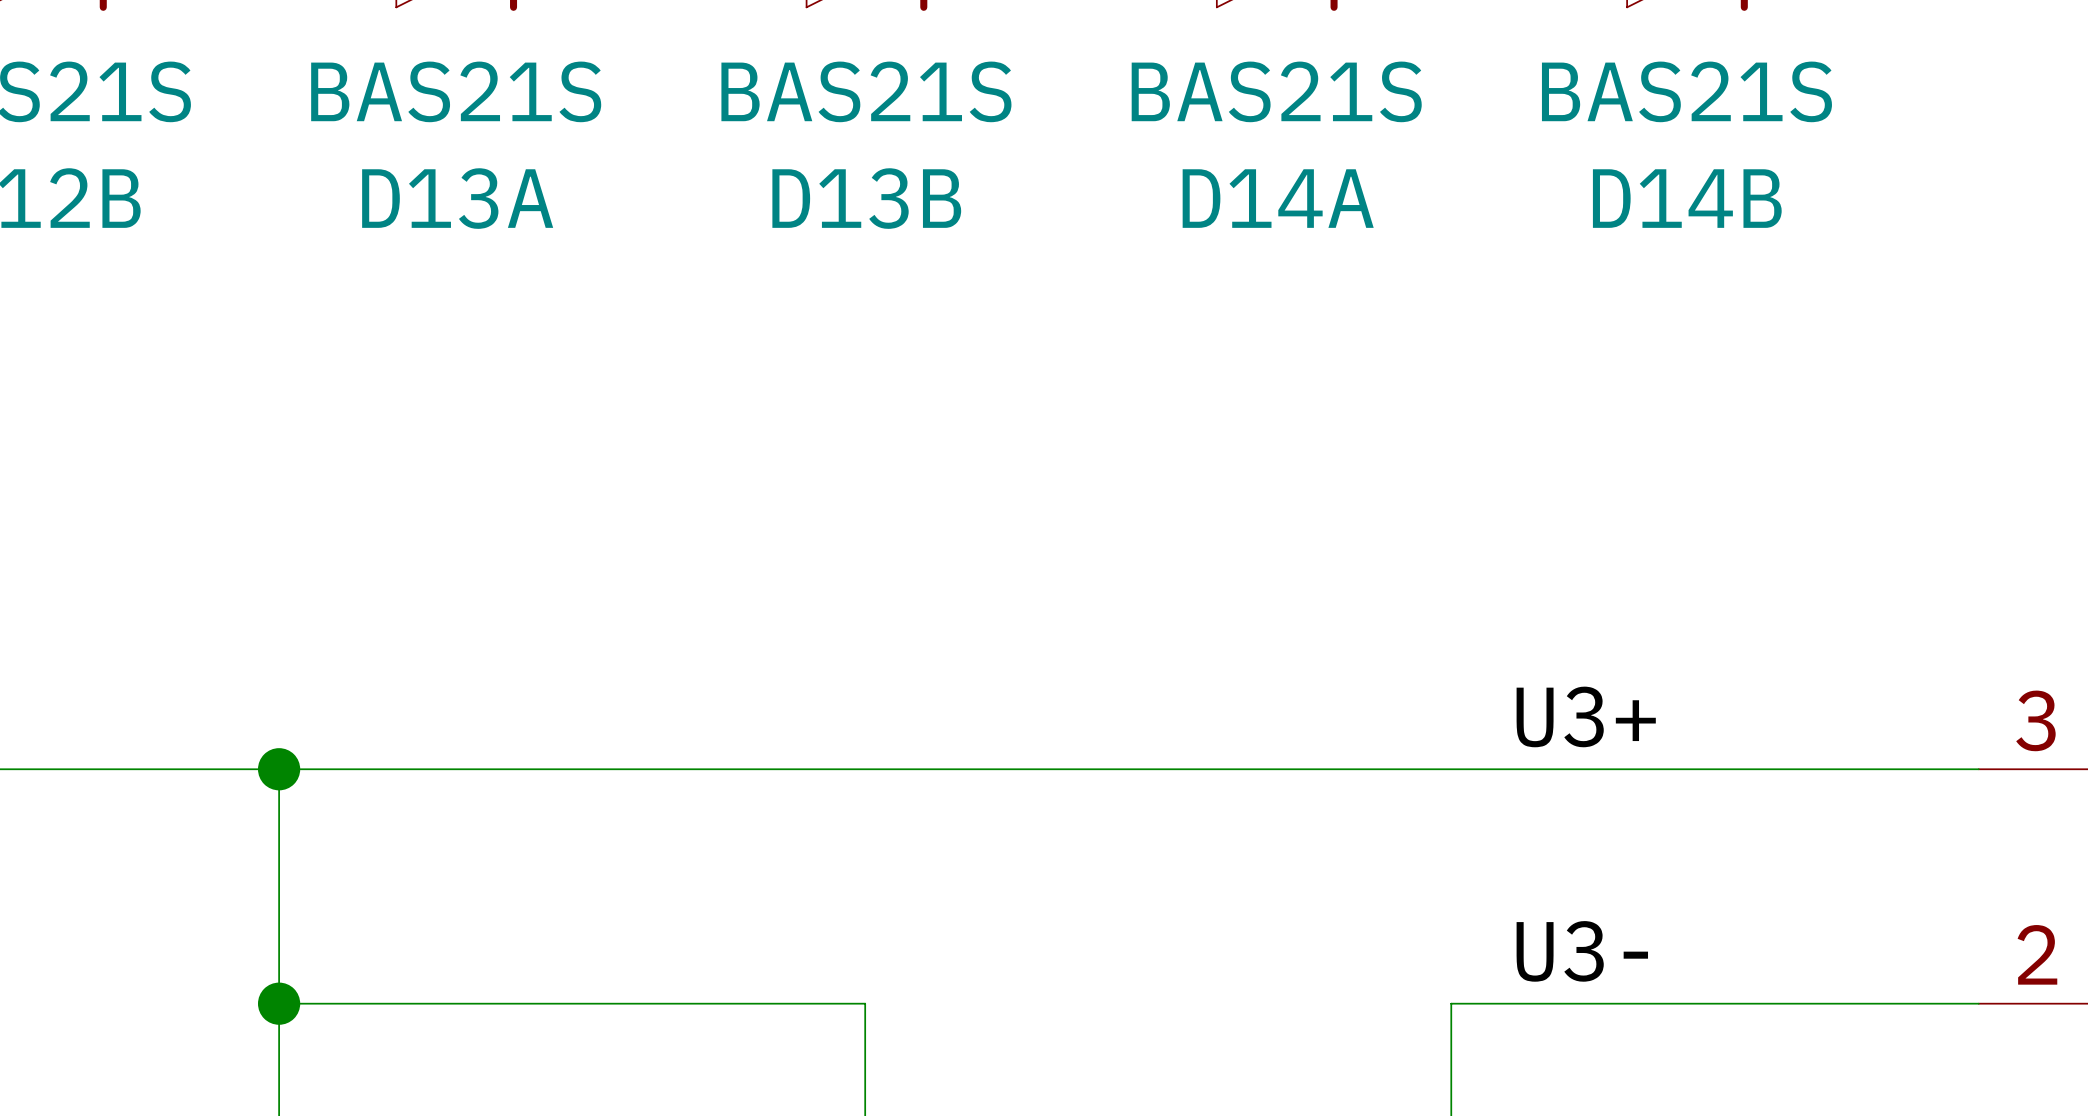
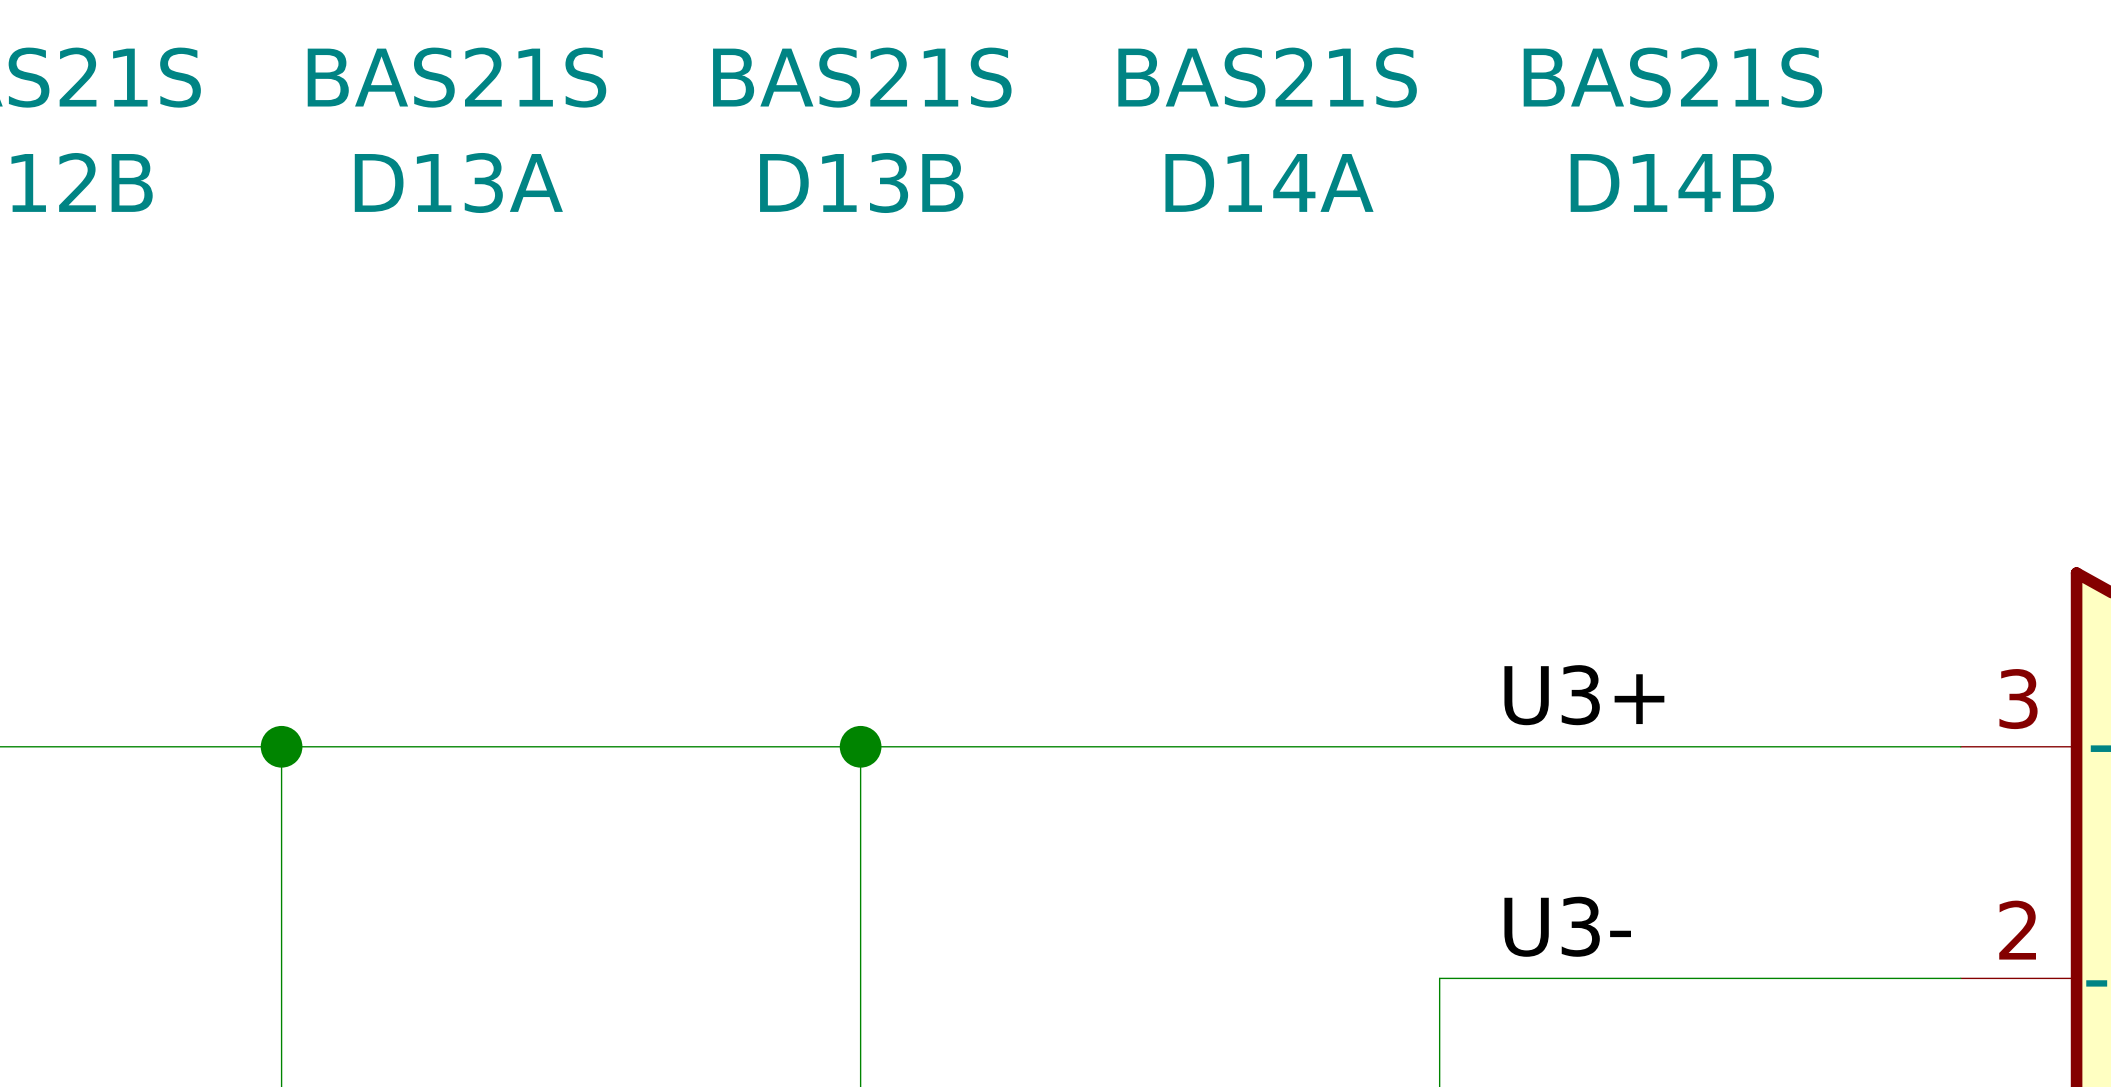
junction: none -> (860, 746)
wire: (279, 1003) (865, 1003) -> (860, 746) (860, 978)
junction: (279, 1003) -> none

